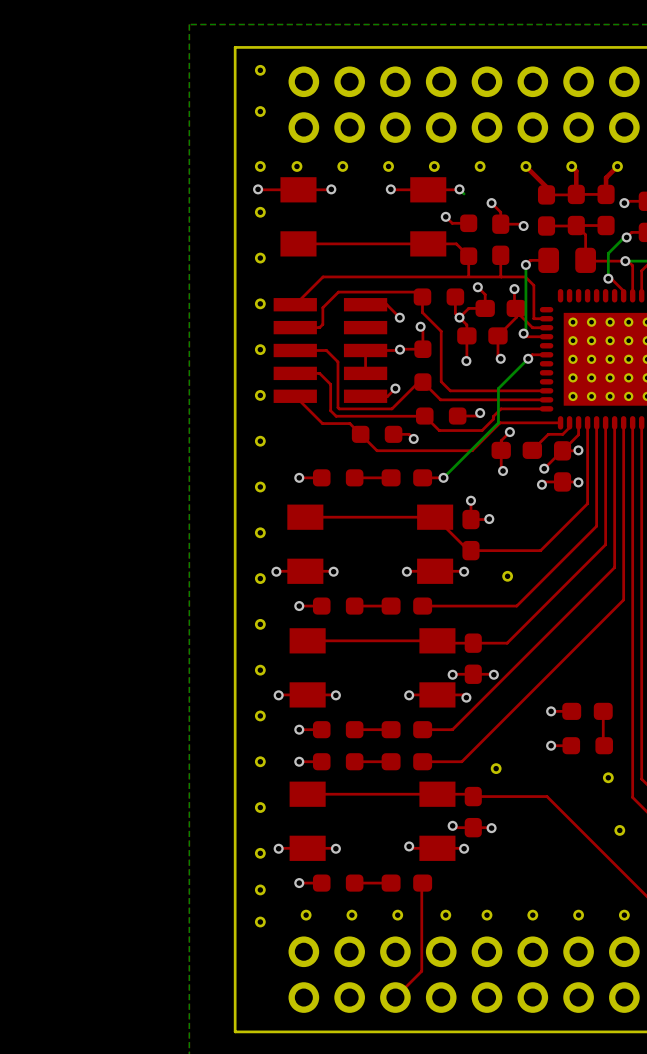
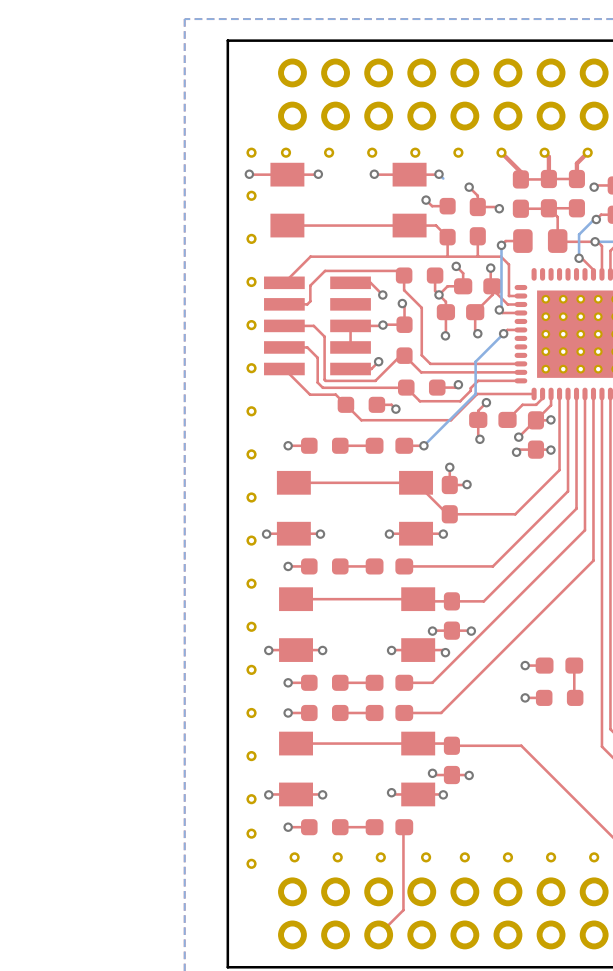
part: (260, 70) -> none
part: (260, 111) -> none
part: (507, 576) -> none
part: (496, 768) -> none
part: (608, 777) -> none
part: (619, 830) -> none

